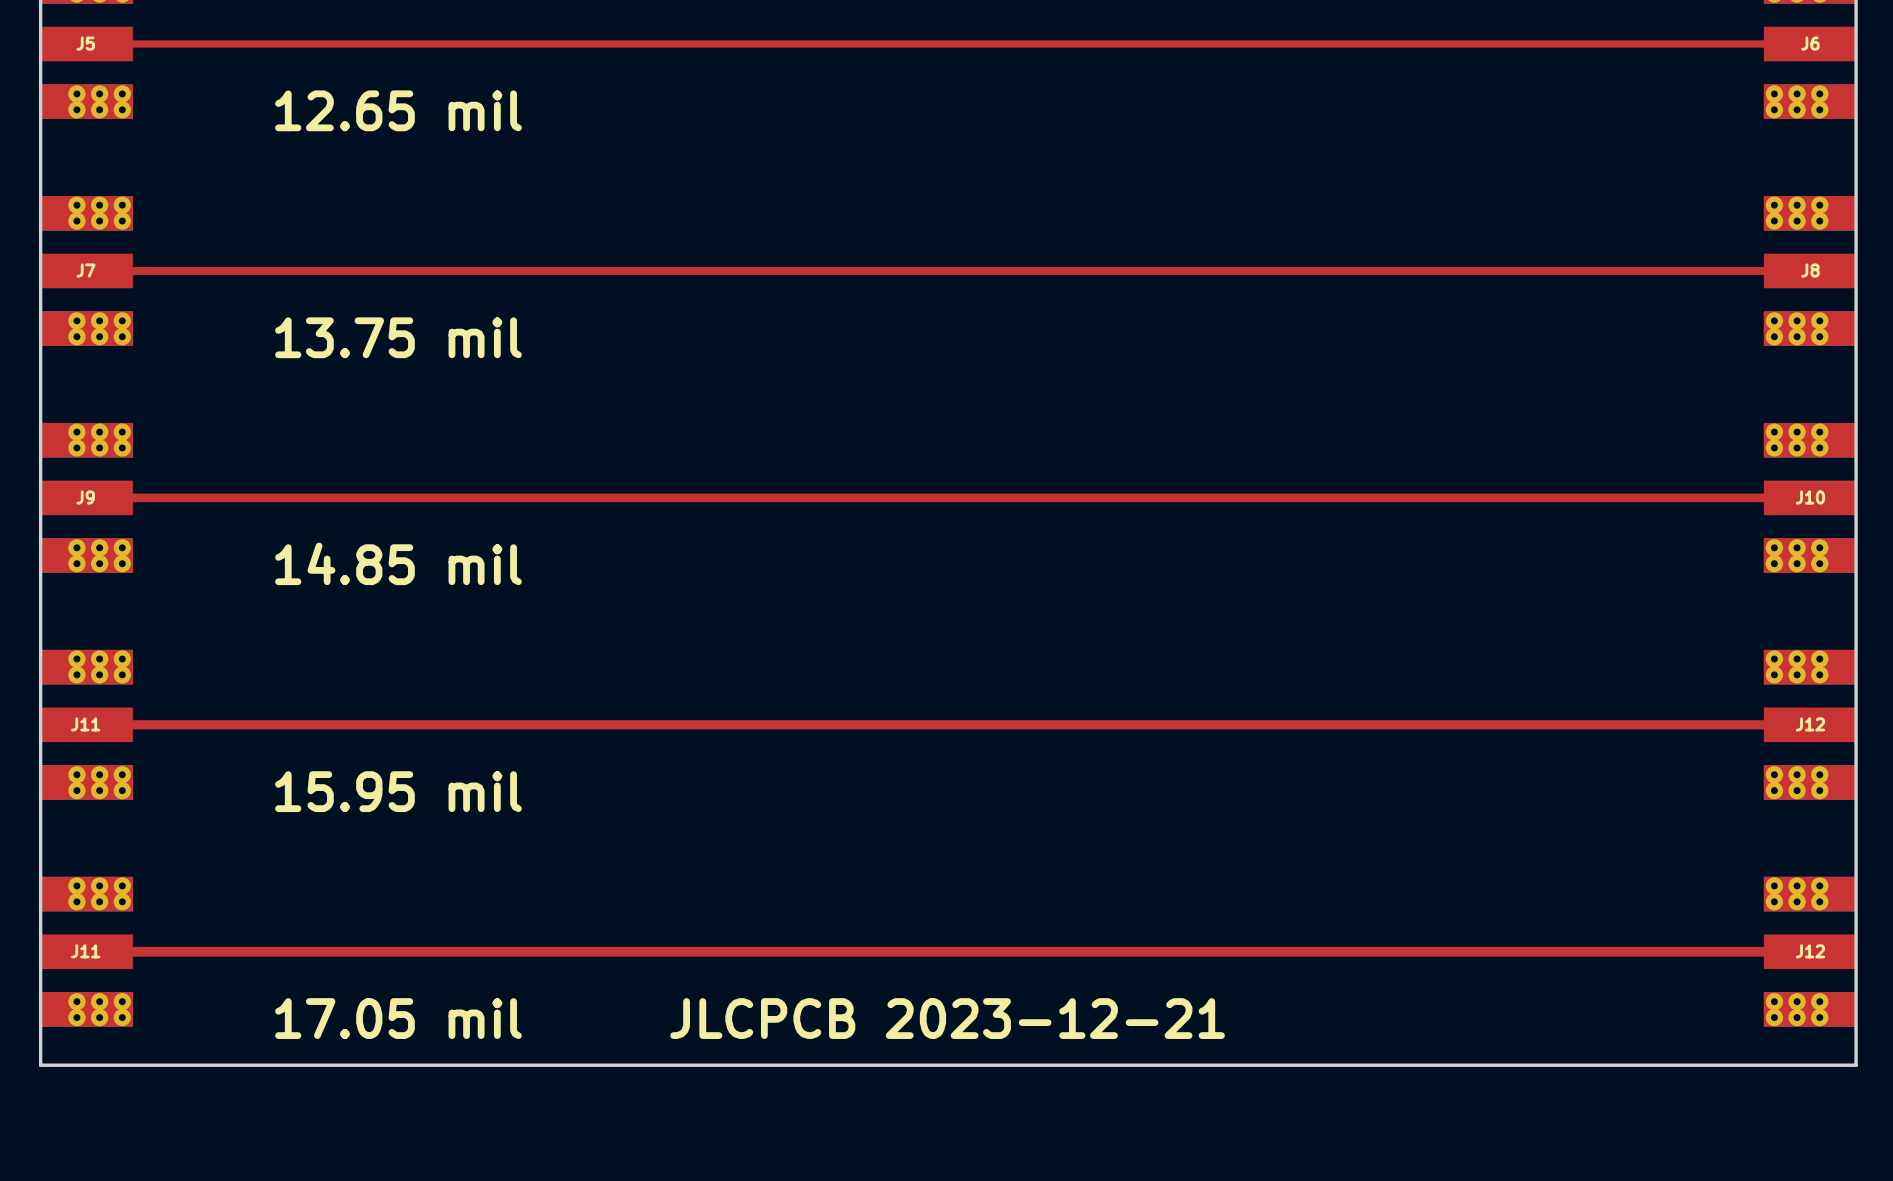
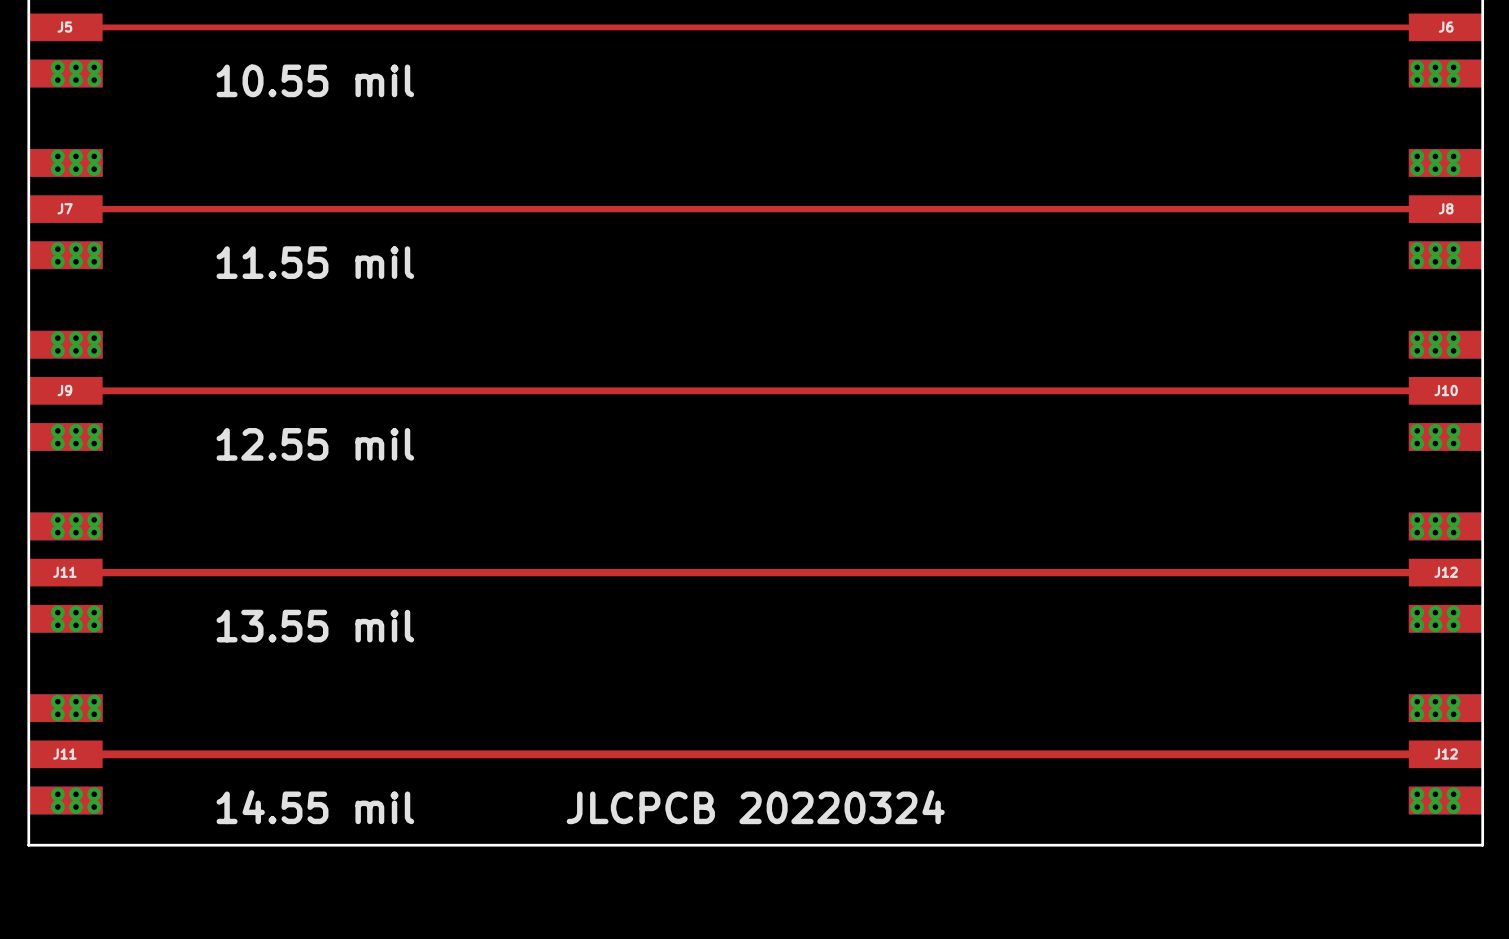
text: 12.65 mil (398, 110) -> 10.55 mil (315, 80)
text: 13.75 mil (398, 337) -> 11.55 mil (315, 262)
text: 14.85 mil (398, 563) -> 12.55 mil (315, 444)
text: 15.95 mil (398, 791) -> 13.55 mil (315, 626)
text: 17.05 mil (398, 1018) -> 14.55 mil (315, 807)
text: JLCPCB 2023-12-21 (947, 1018) -> JLCPCB 20220324 (755, 807)

